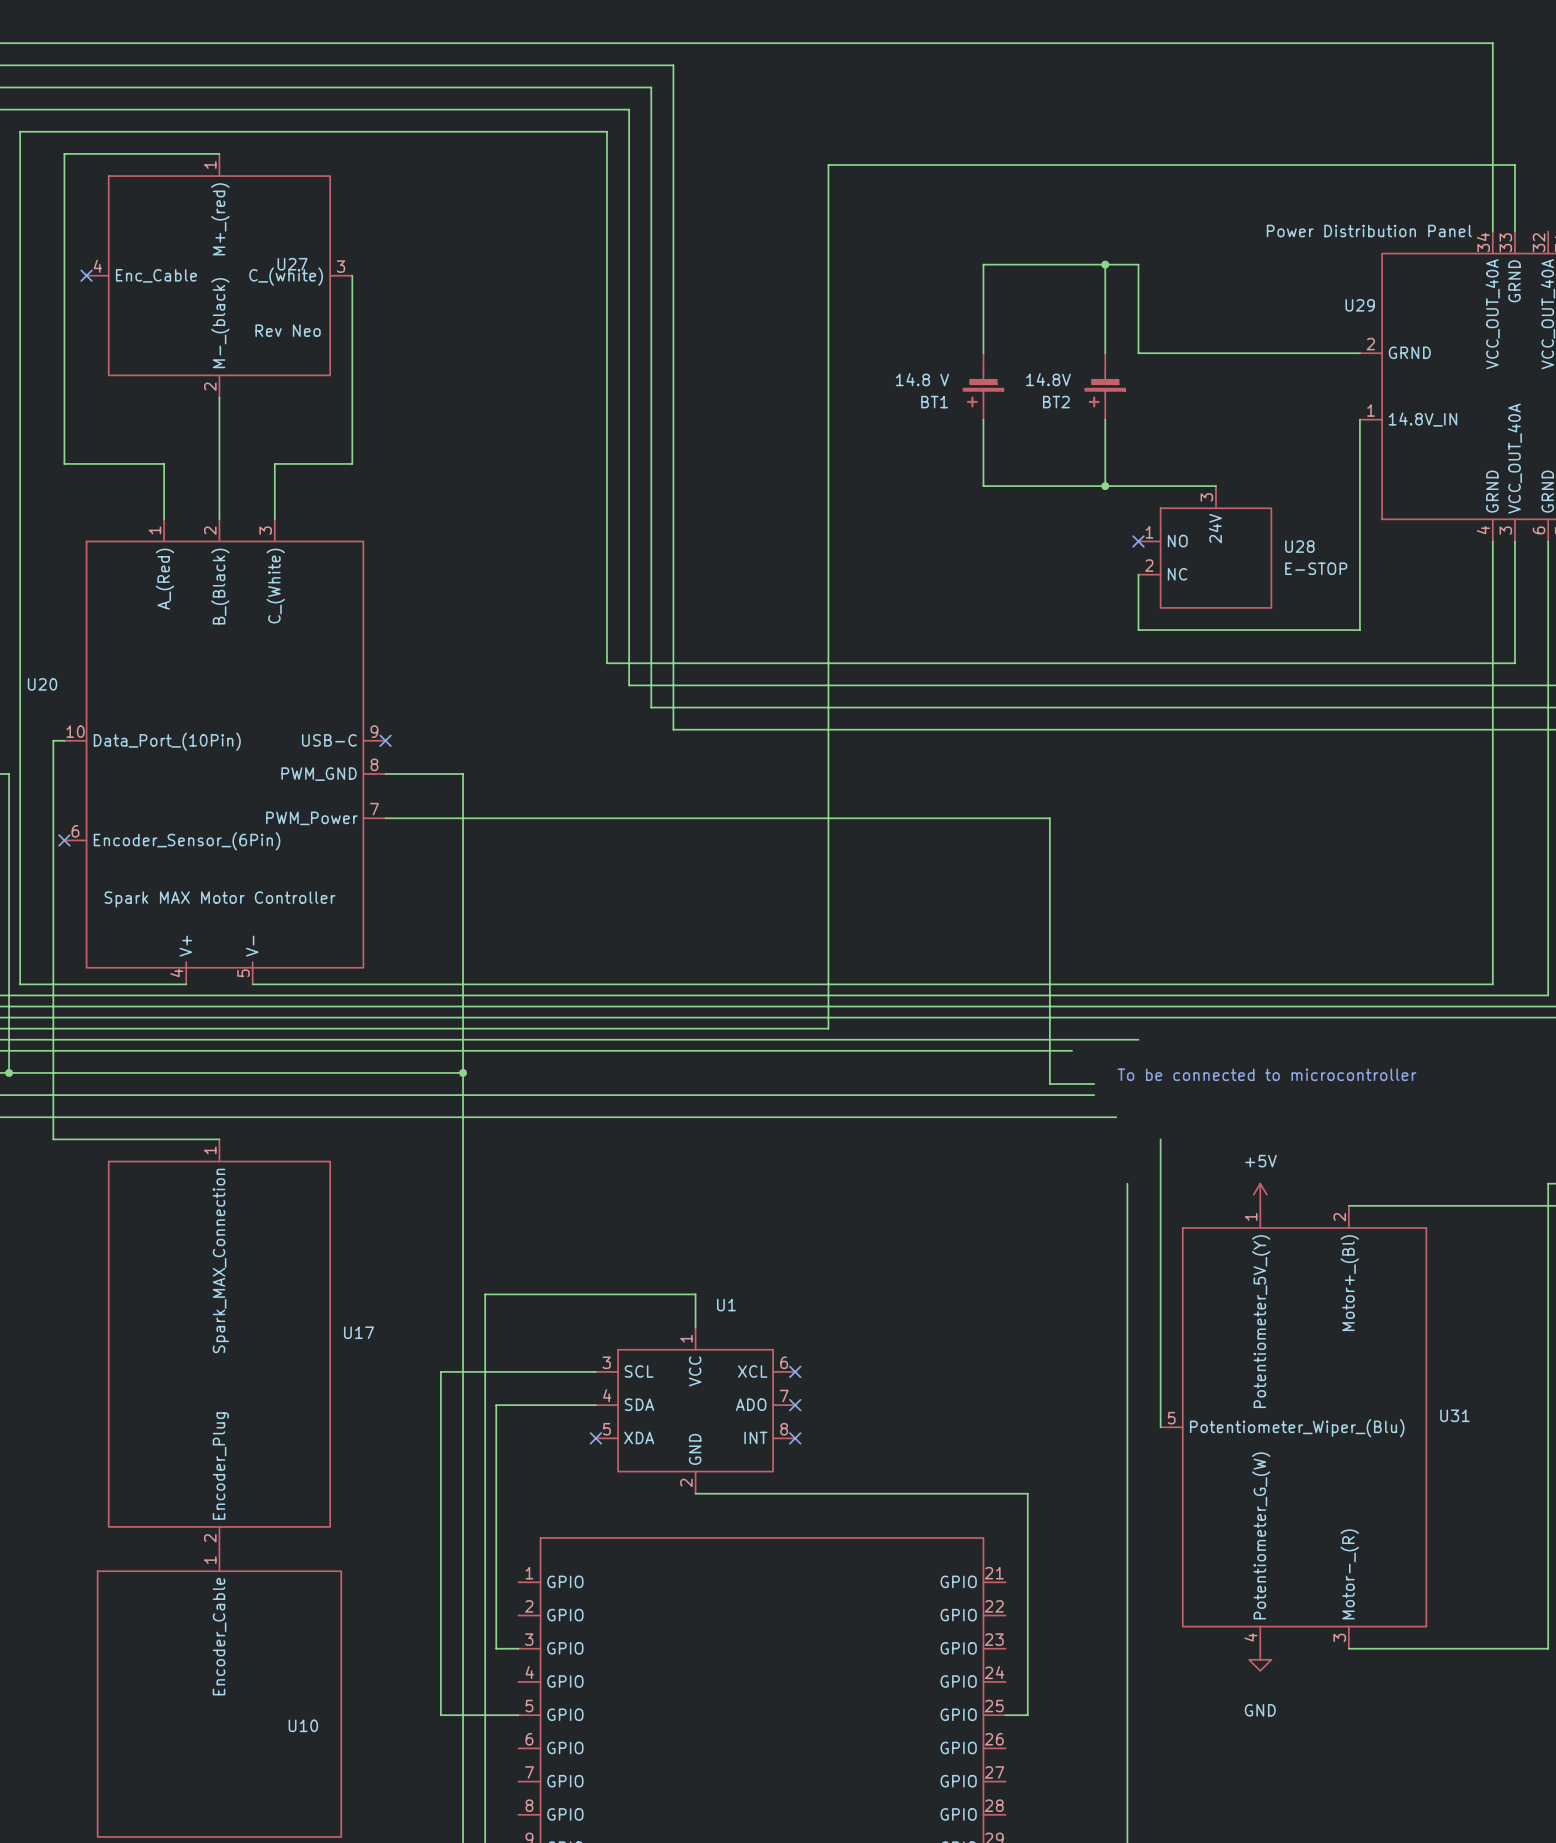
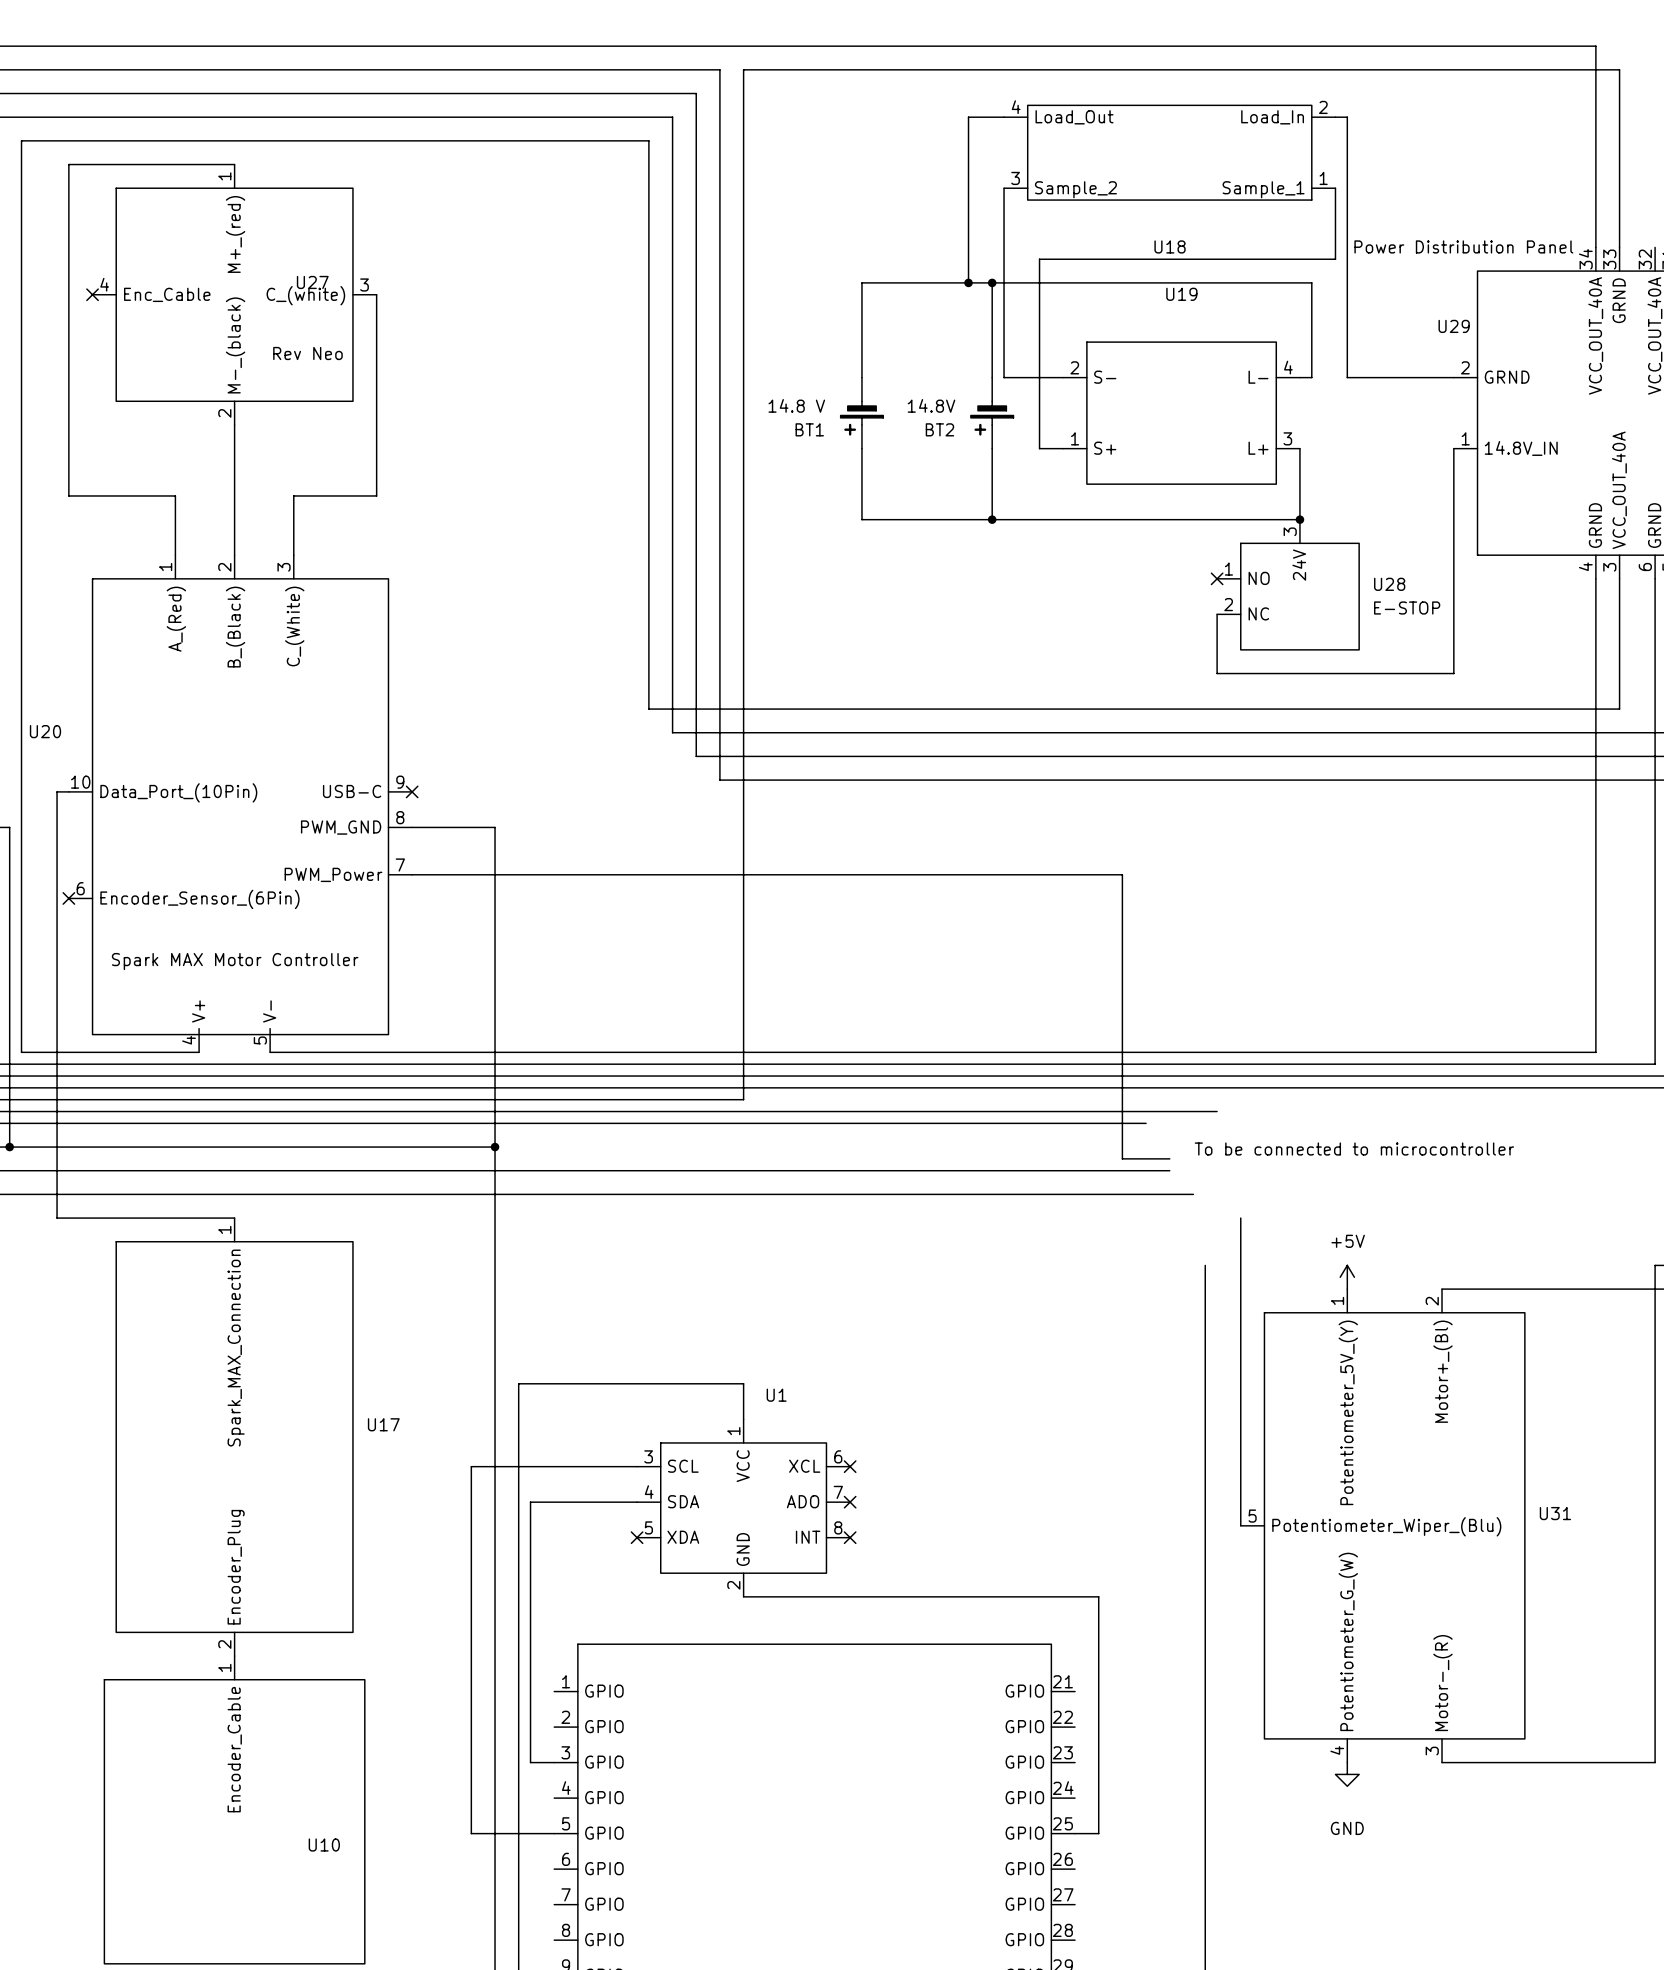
wire: none -> (1004, 117) (968, 117) (968, 282)
U18: none -> (1169, 152)
wire: (1514, 164) (828, 164) (828, 1028) (695, 1028) -> (1619, 176) (1619, 69) (743, 69) (743, 1099)
wire: none -> (1004, 188) (1004, 377) (1063, 377)
wire: none -> (1335, 188) (1335, 259) (1039, 259) (1039, 448) (1063, 448)
junction: none -> (968, 282)
junction: none -> (992, 282)
wire: (983, 264) (983, 353) -> (1051, 282) (861, 282) (861, 377)
wire: (1105, 264) (1105, 353) -> (992, 282) (992, 377)
junction: (1105, 264) -> none
wire: (1138, 264) (1138, 353) (1215, 353) -> (1217, 282) (1311, 282) (1311, 377)
wire: (1227, 353) (1260, 353) -> (1335, 117) (1347, 117) (1347, 377)
BT1 position: (983, 386) -> (861, 413)
BT2 position: (1105, 386) -> (992, 413)
U19: none -> (1181, 413)
wire: (983, 419) (983, 486) -> (861, 448) (861, 519) (1051, 519)
wire: (1105, 419) (1105, 486) -> (992, 448) (992, 519)
wire: none -> (1299, 448) (1299, 519)
junction: none -> (992, 519)
junction: (1105, 486) -> none
junction: none -> (1299, 519)

